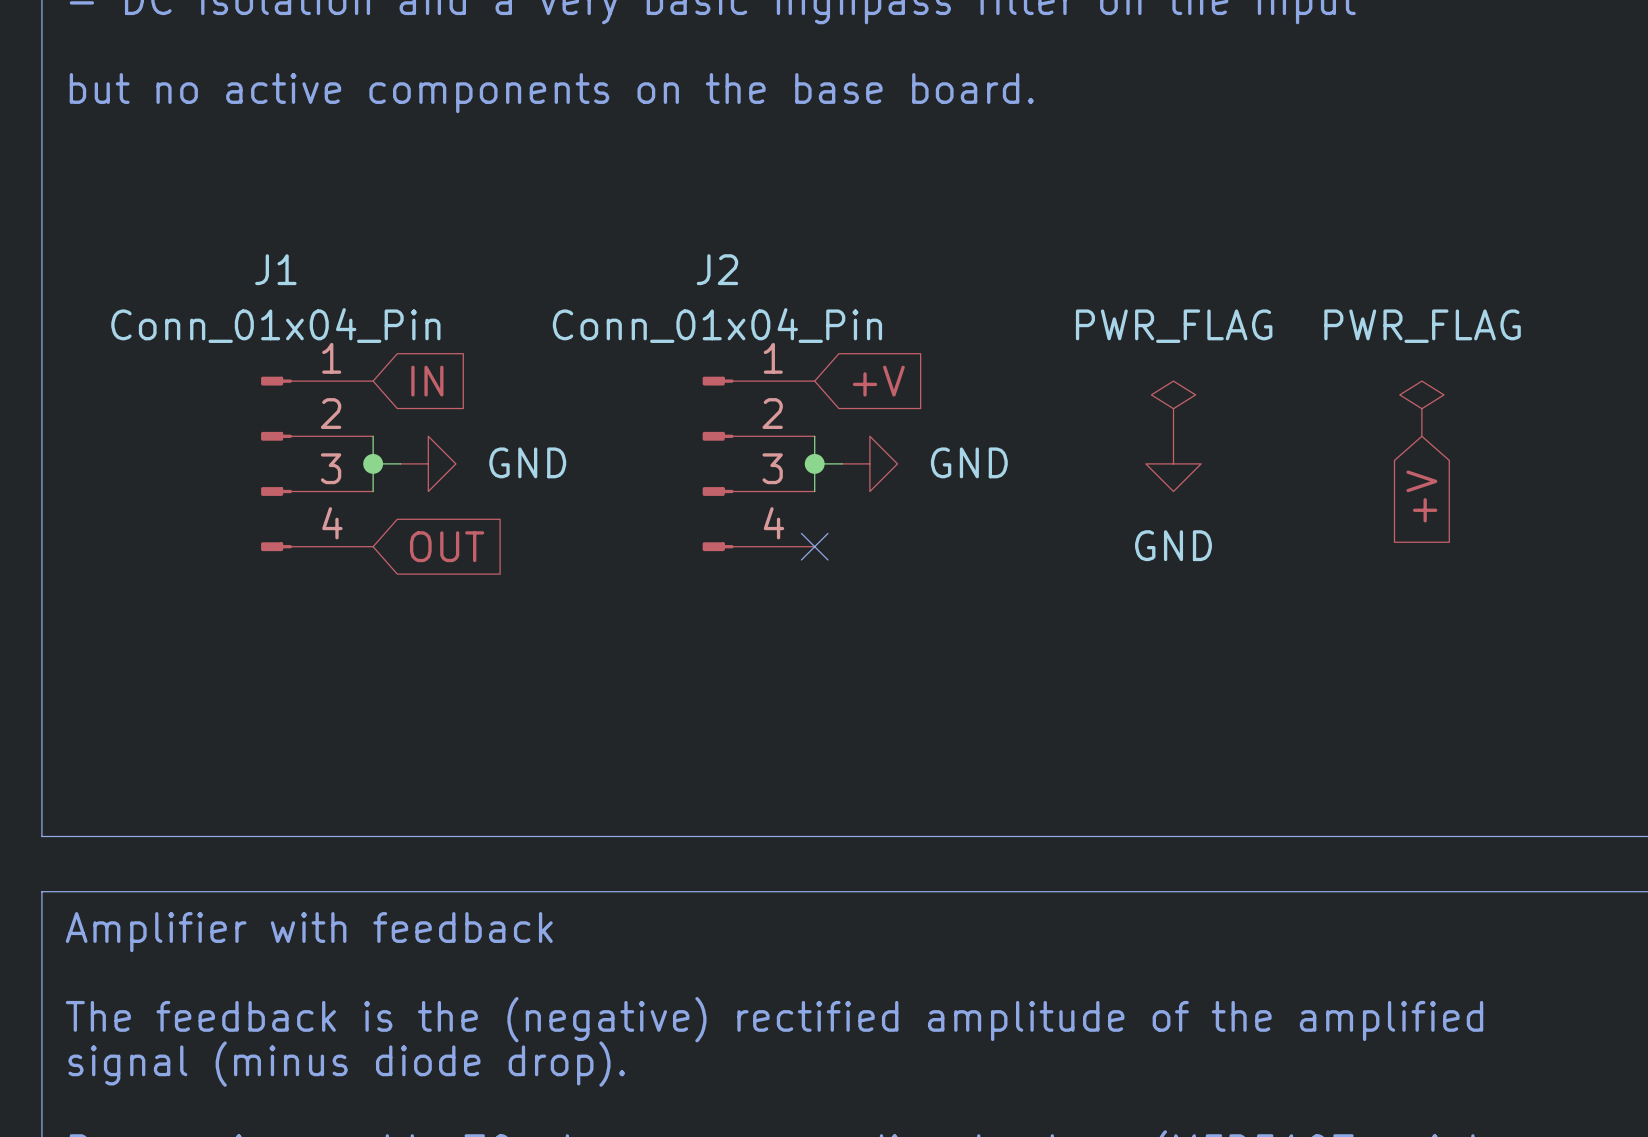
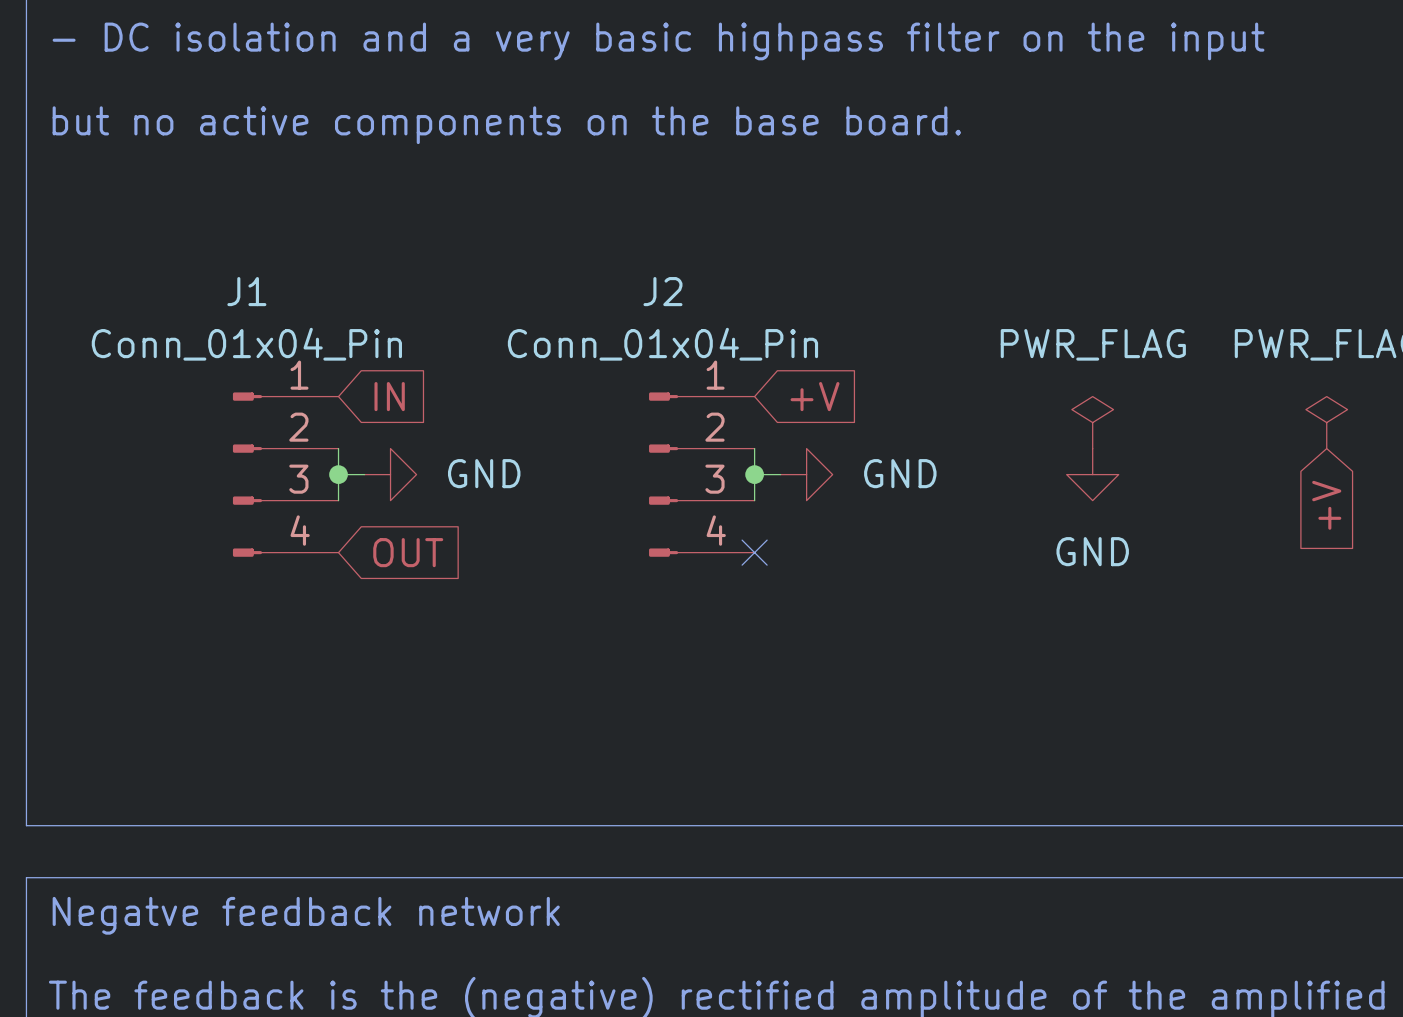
text: Amplifier with feedback (309, 932) -> Negatve feedback network (306, 915)

